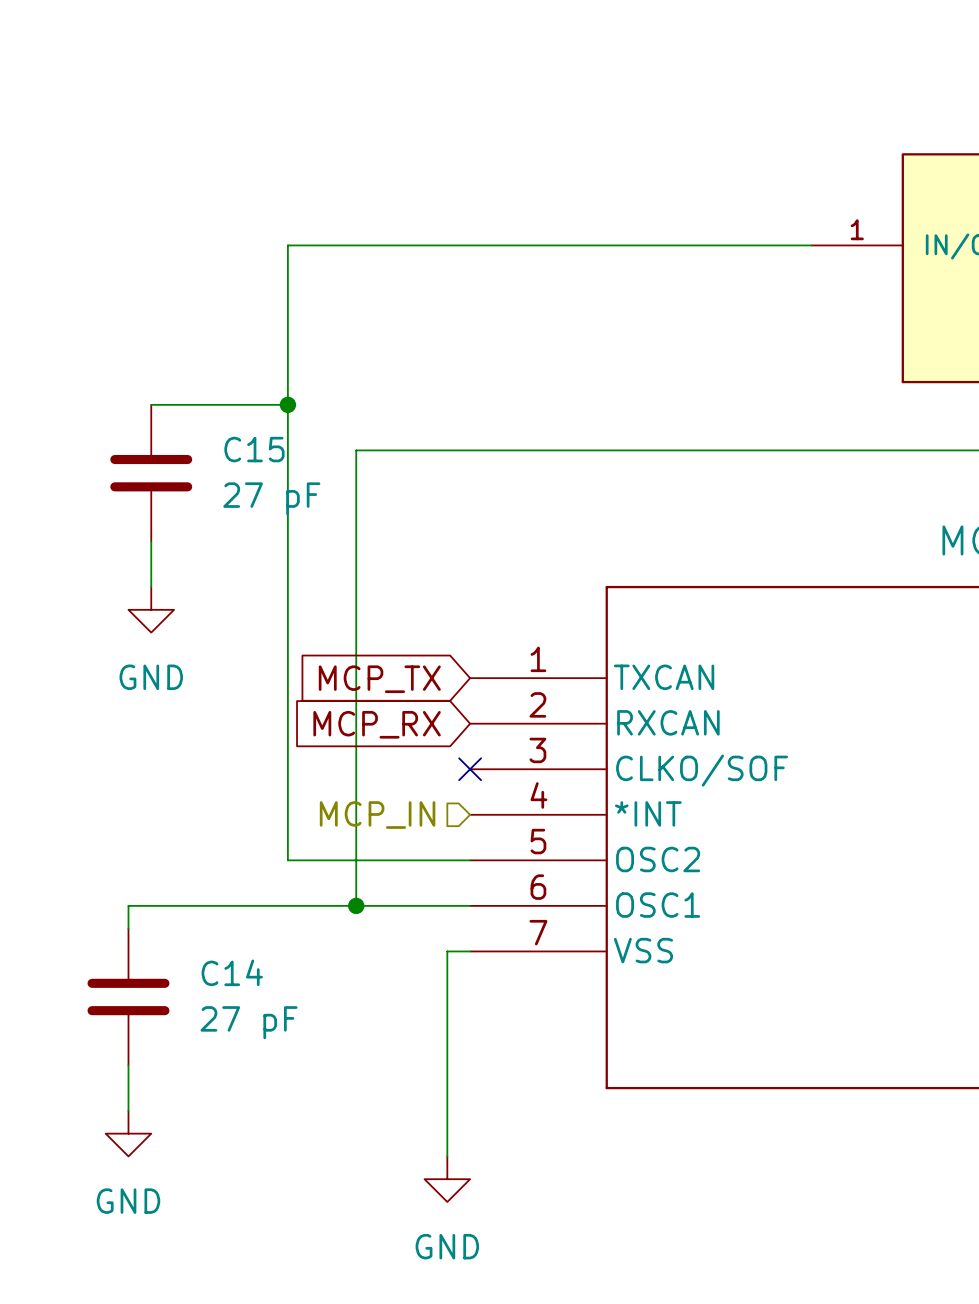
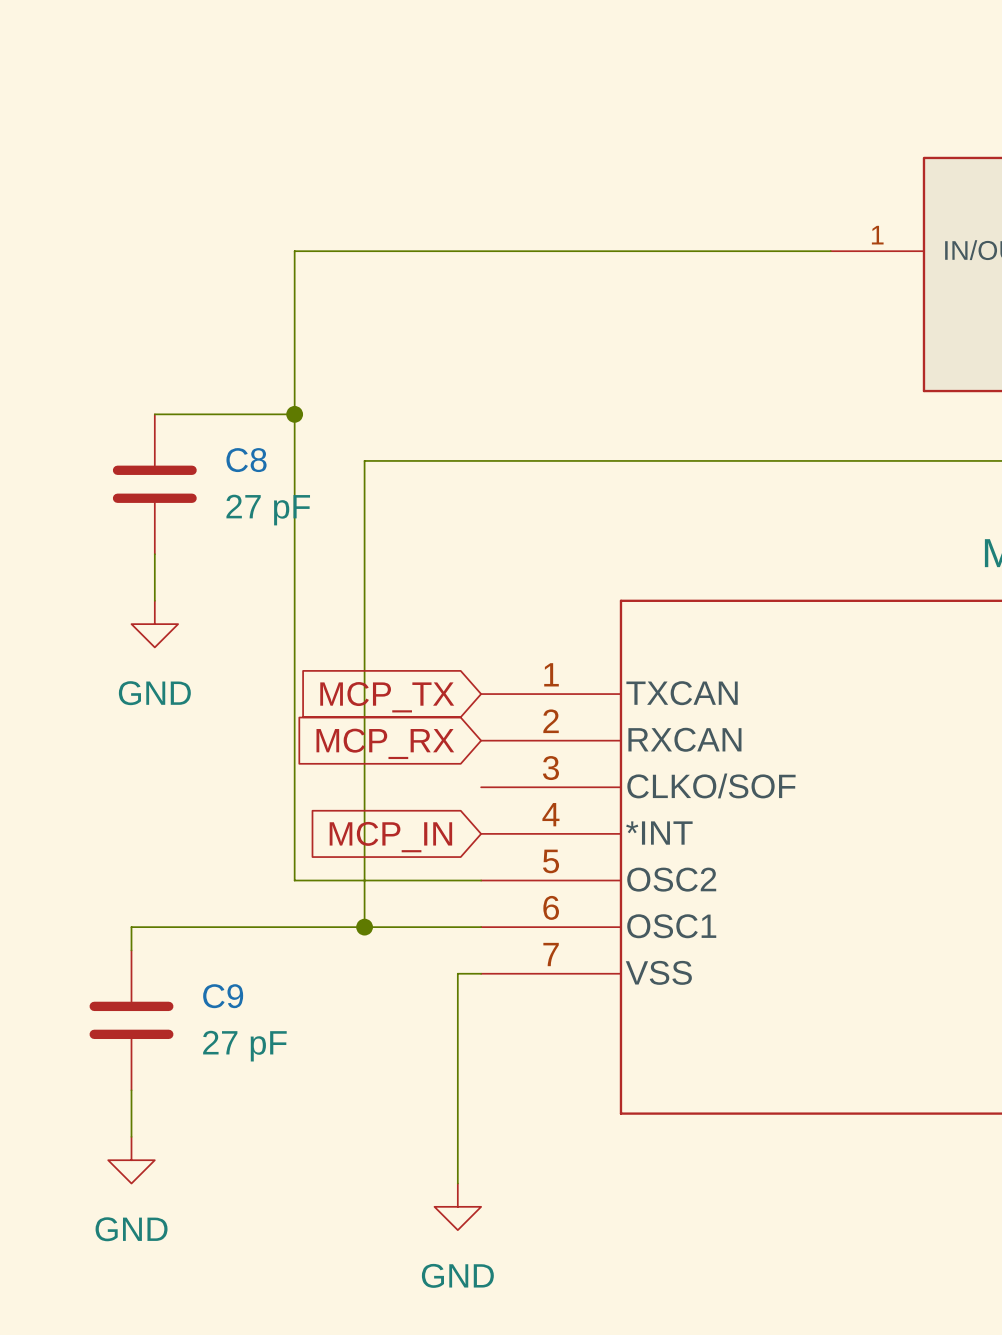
C15 name: C15 (254, 449) -> C8 (246, 460)
no-connect mark: (470, 769) -> none
hierarchical label: MCP_IN (377, 815) -> none
global label: none -> MCP_IN (390, 837)
C14 name: C14 (232, 972) -> C9 (223, 996)

